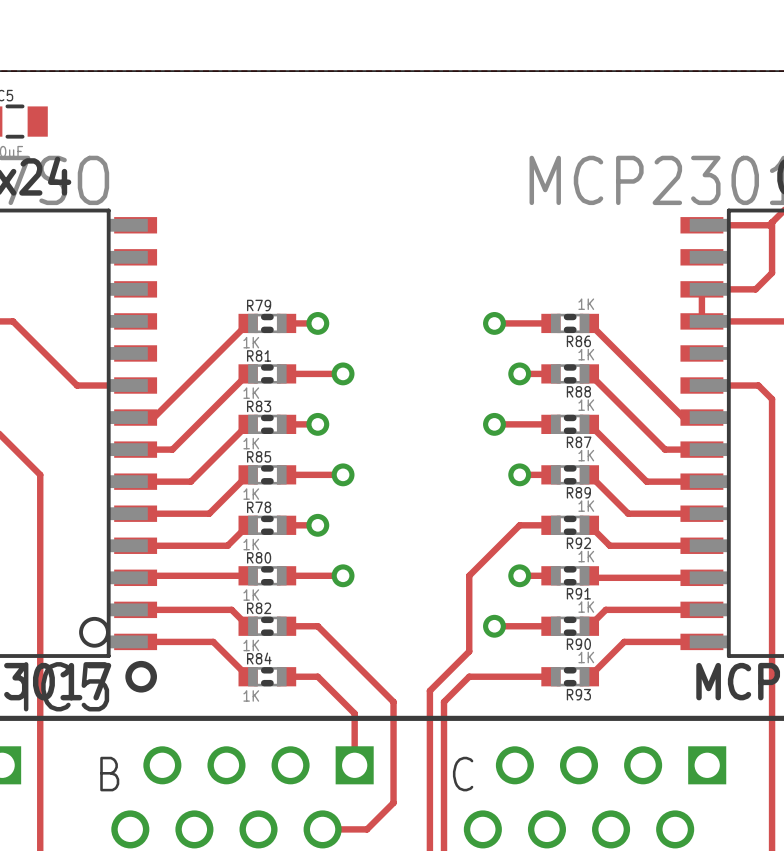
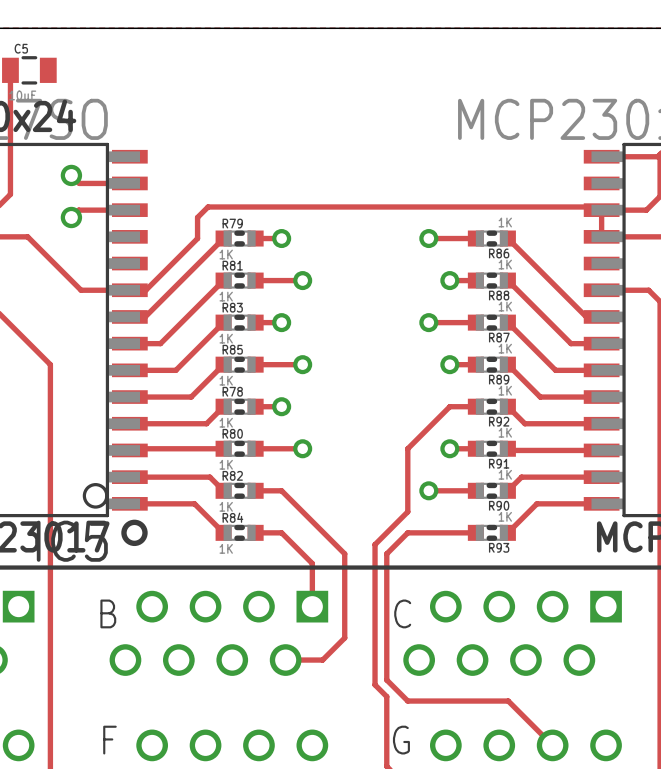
track: none -> (71, 175) (79, 183) (129, 183)
via: none -> (71, 175)
track: none -> (129, 210) (78, 210) (71, 217)
track: none -> (601, 210) (598, 206) (208, 206) (197, 217) (197, 238) (145, 290) (129, 290)
via: none -> (71, 217)

